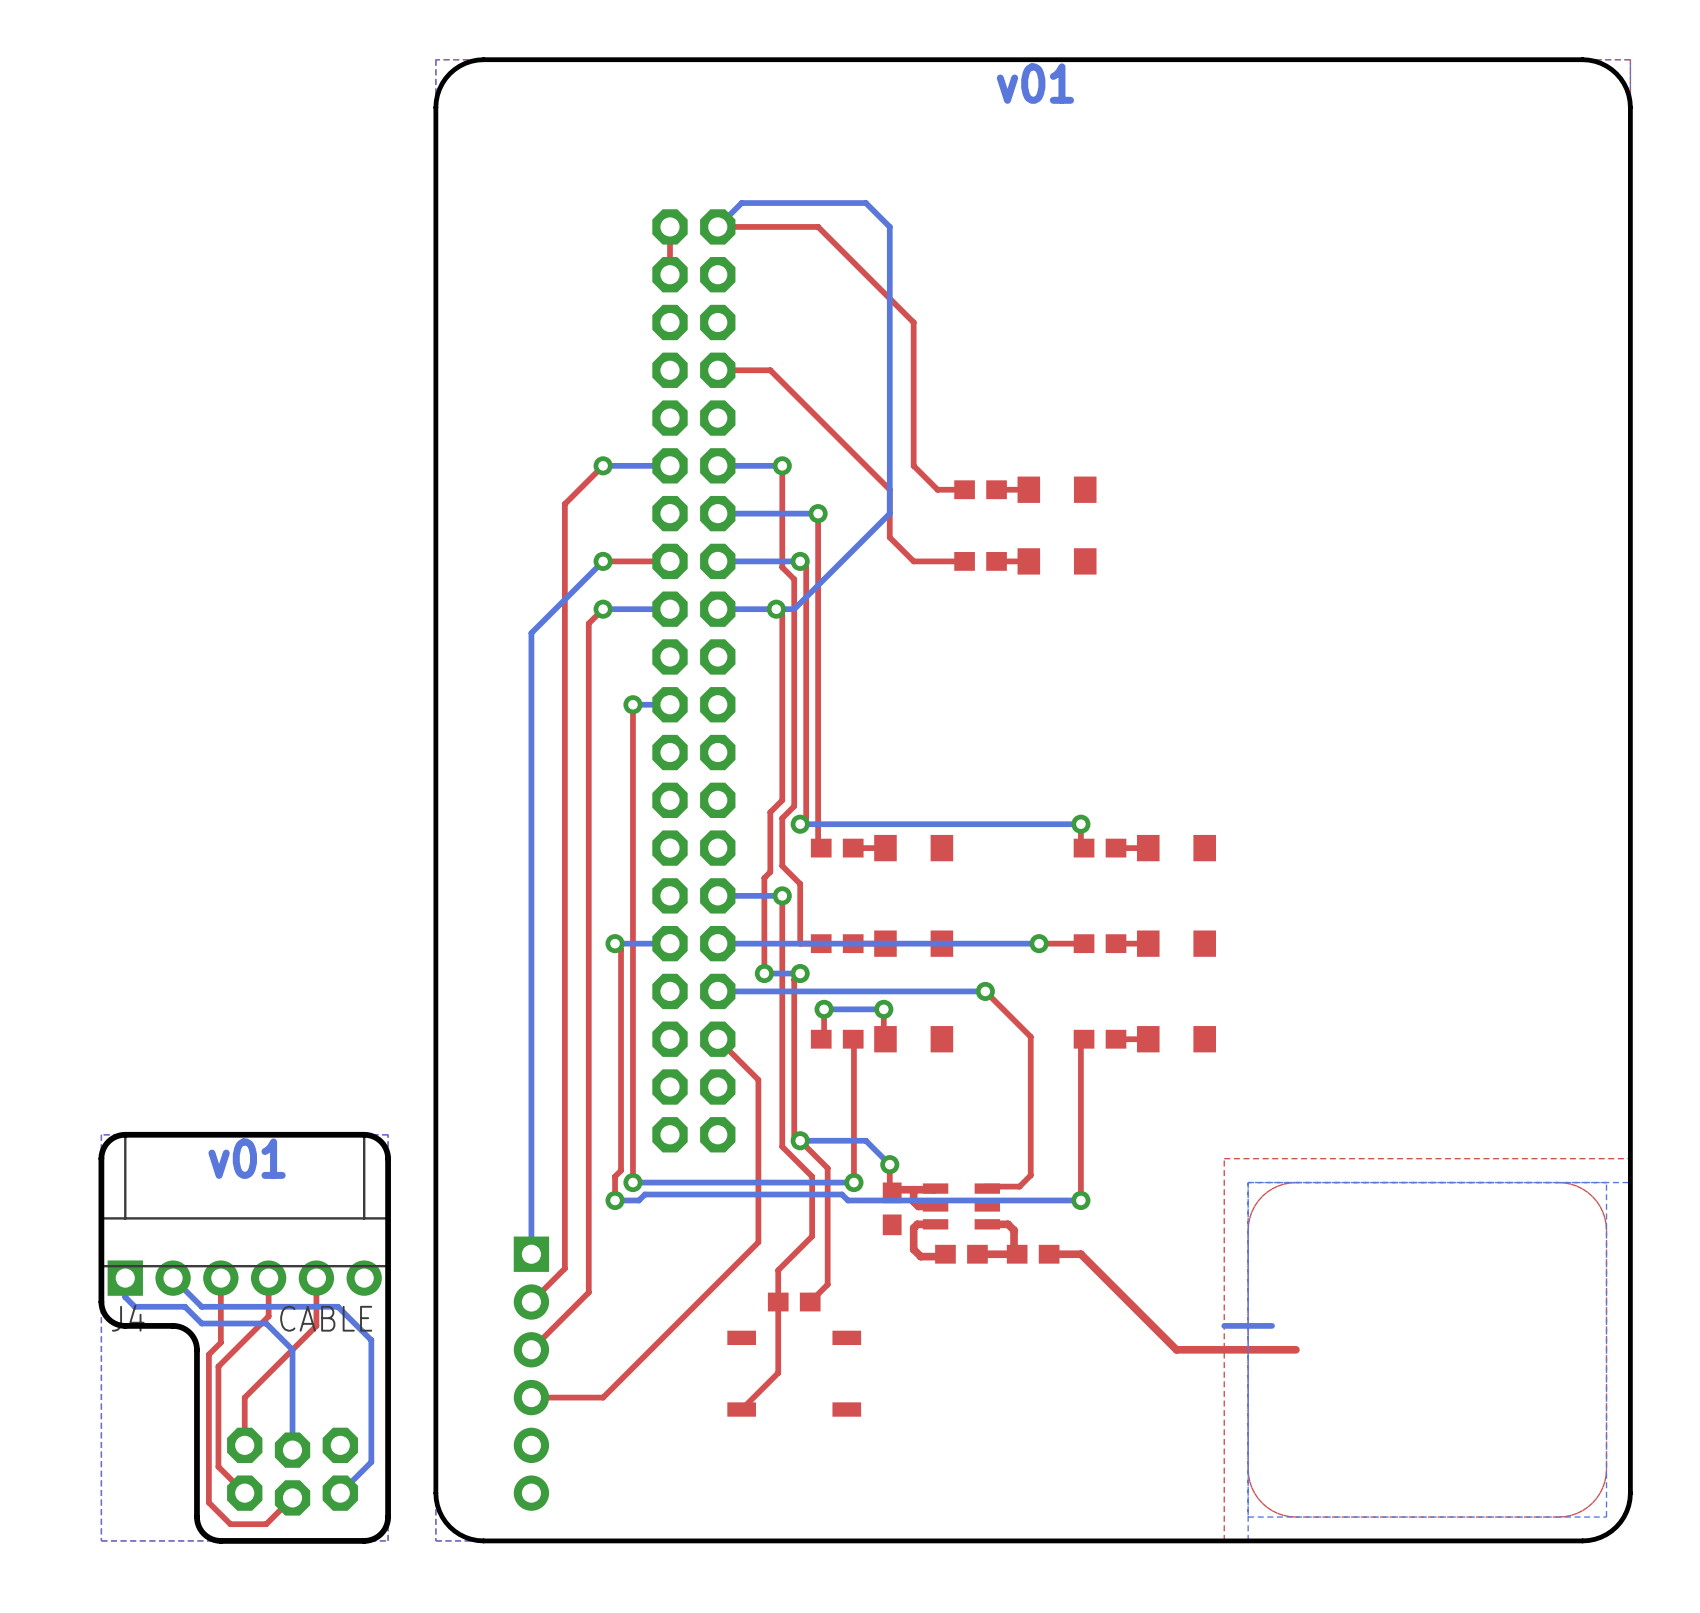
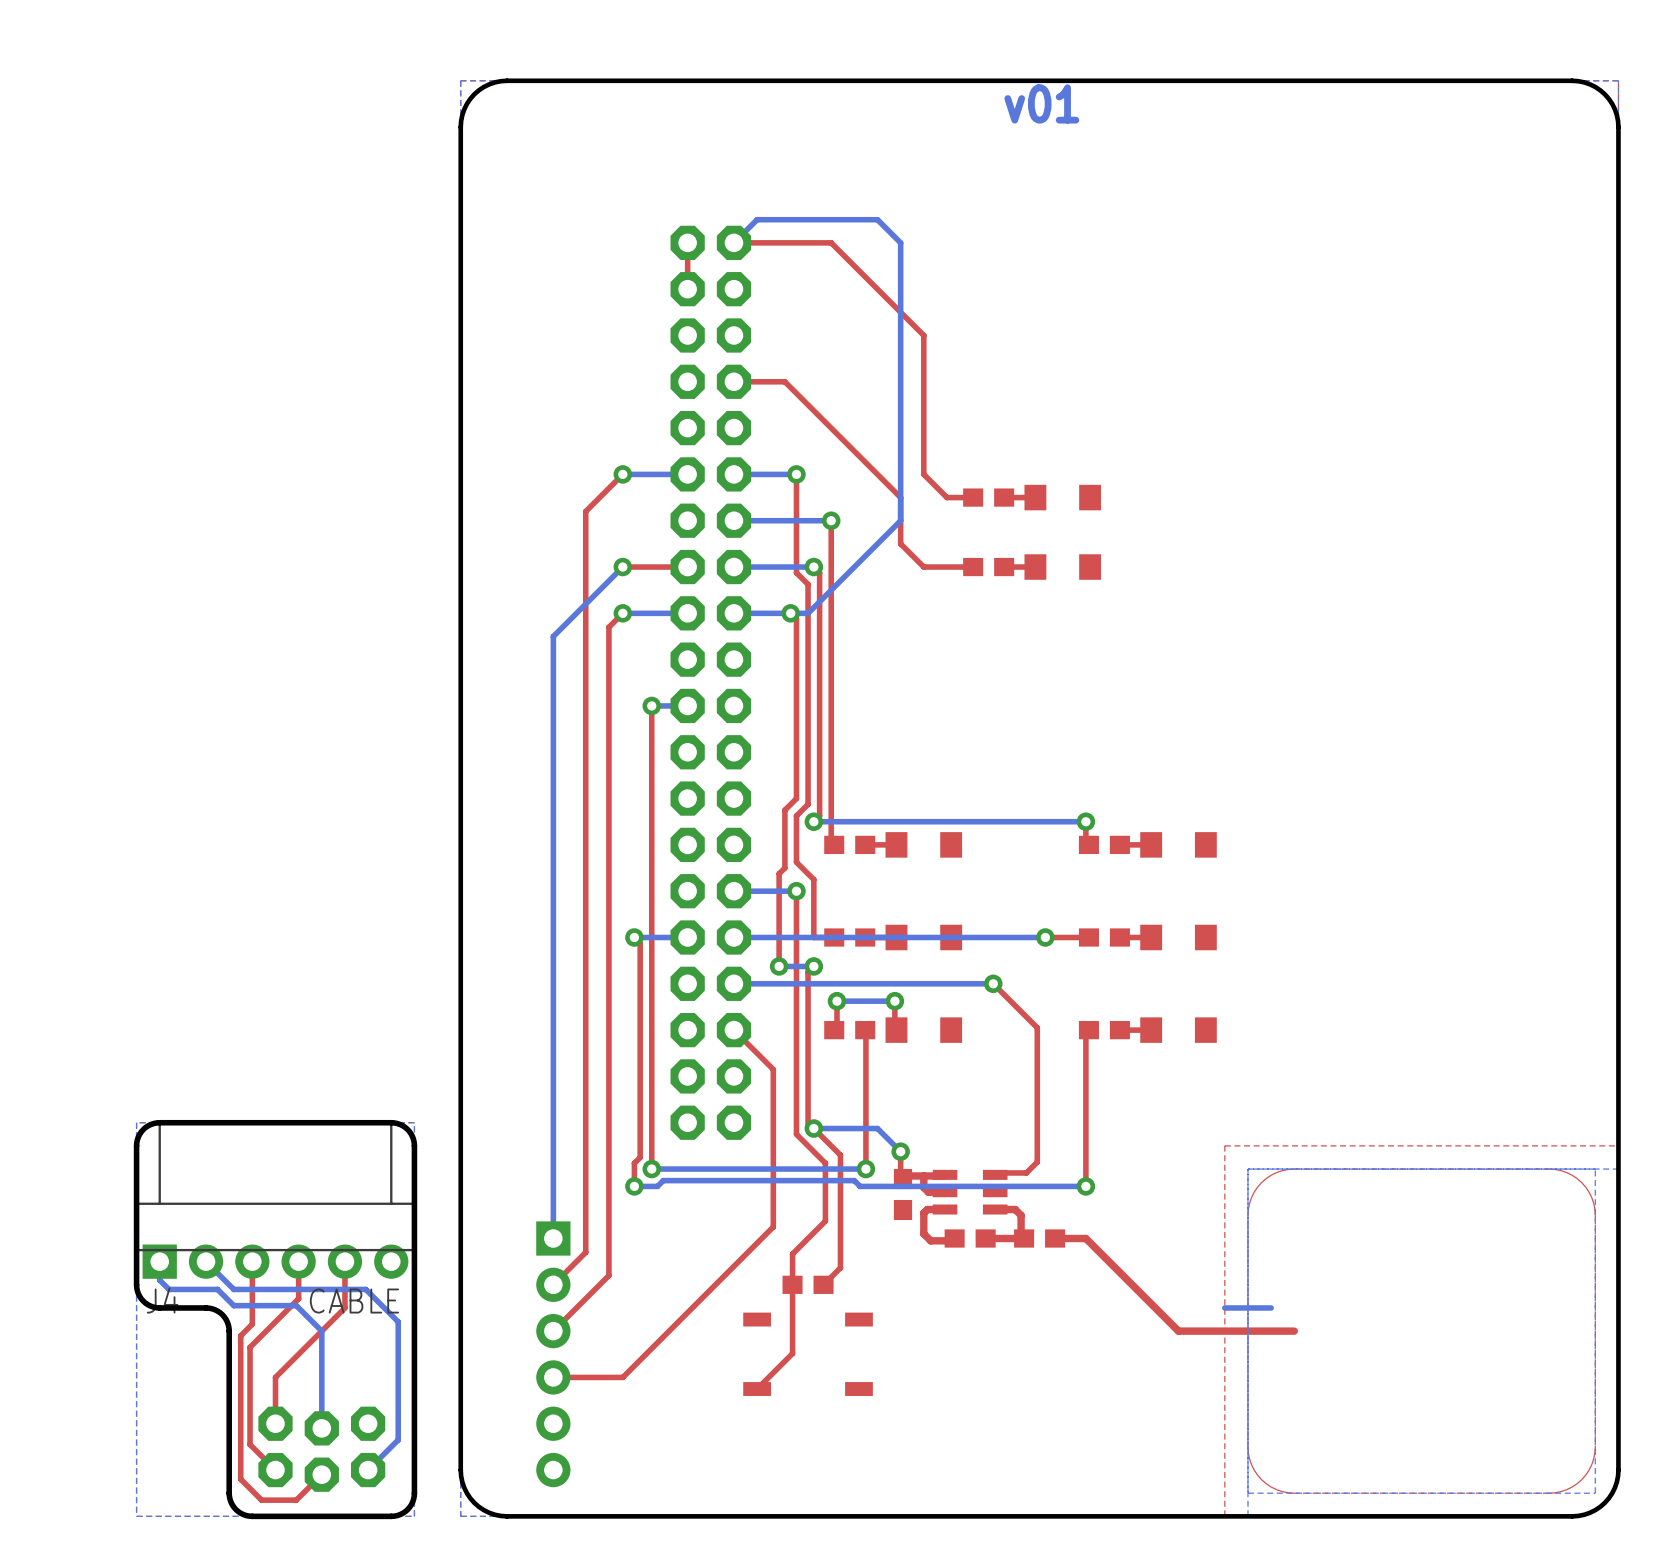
text: v01 (247, 1158) -> none

